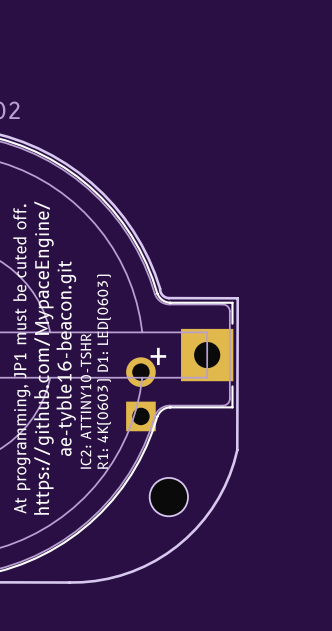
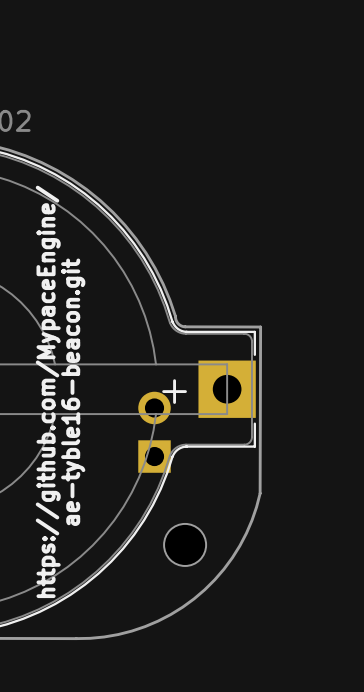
text: At programming, JP1 must be cuted off. (21, 358) -> none
text: R1: 4K(0603) D1: LED(0603) (103, 371) -> none
text: IC2: ATTINY10-TSHR (85, 401) -> none

